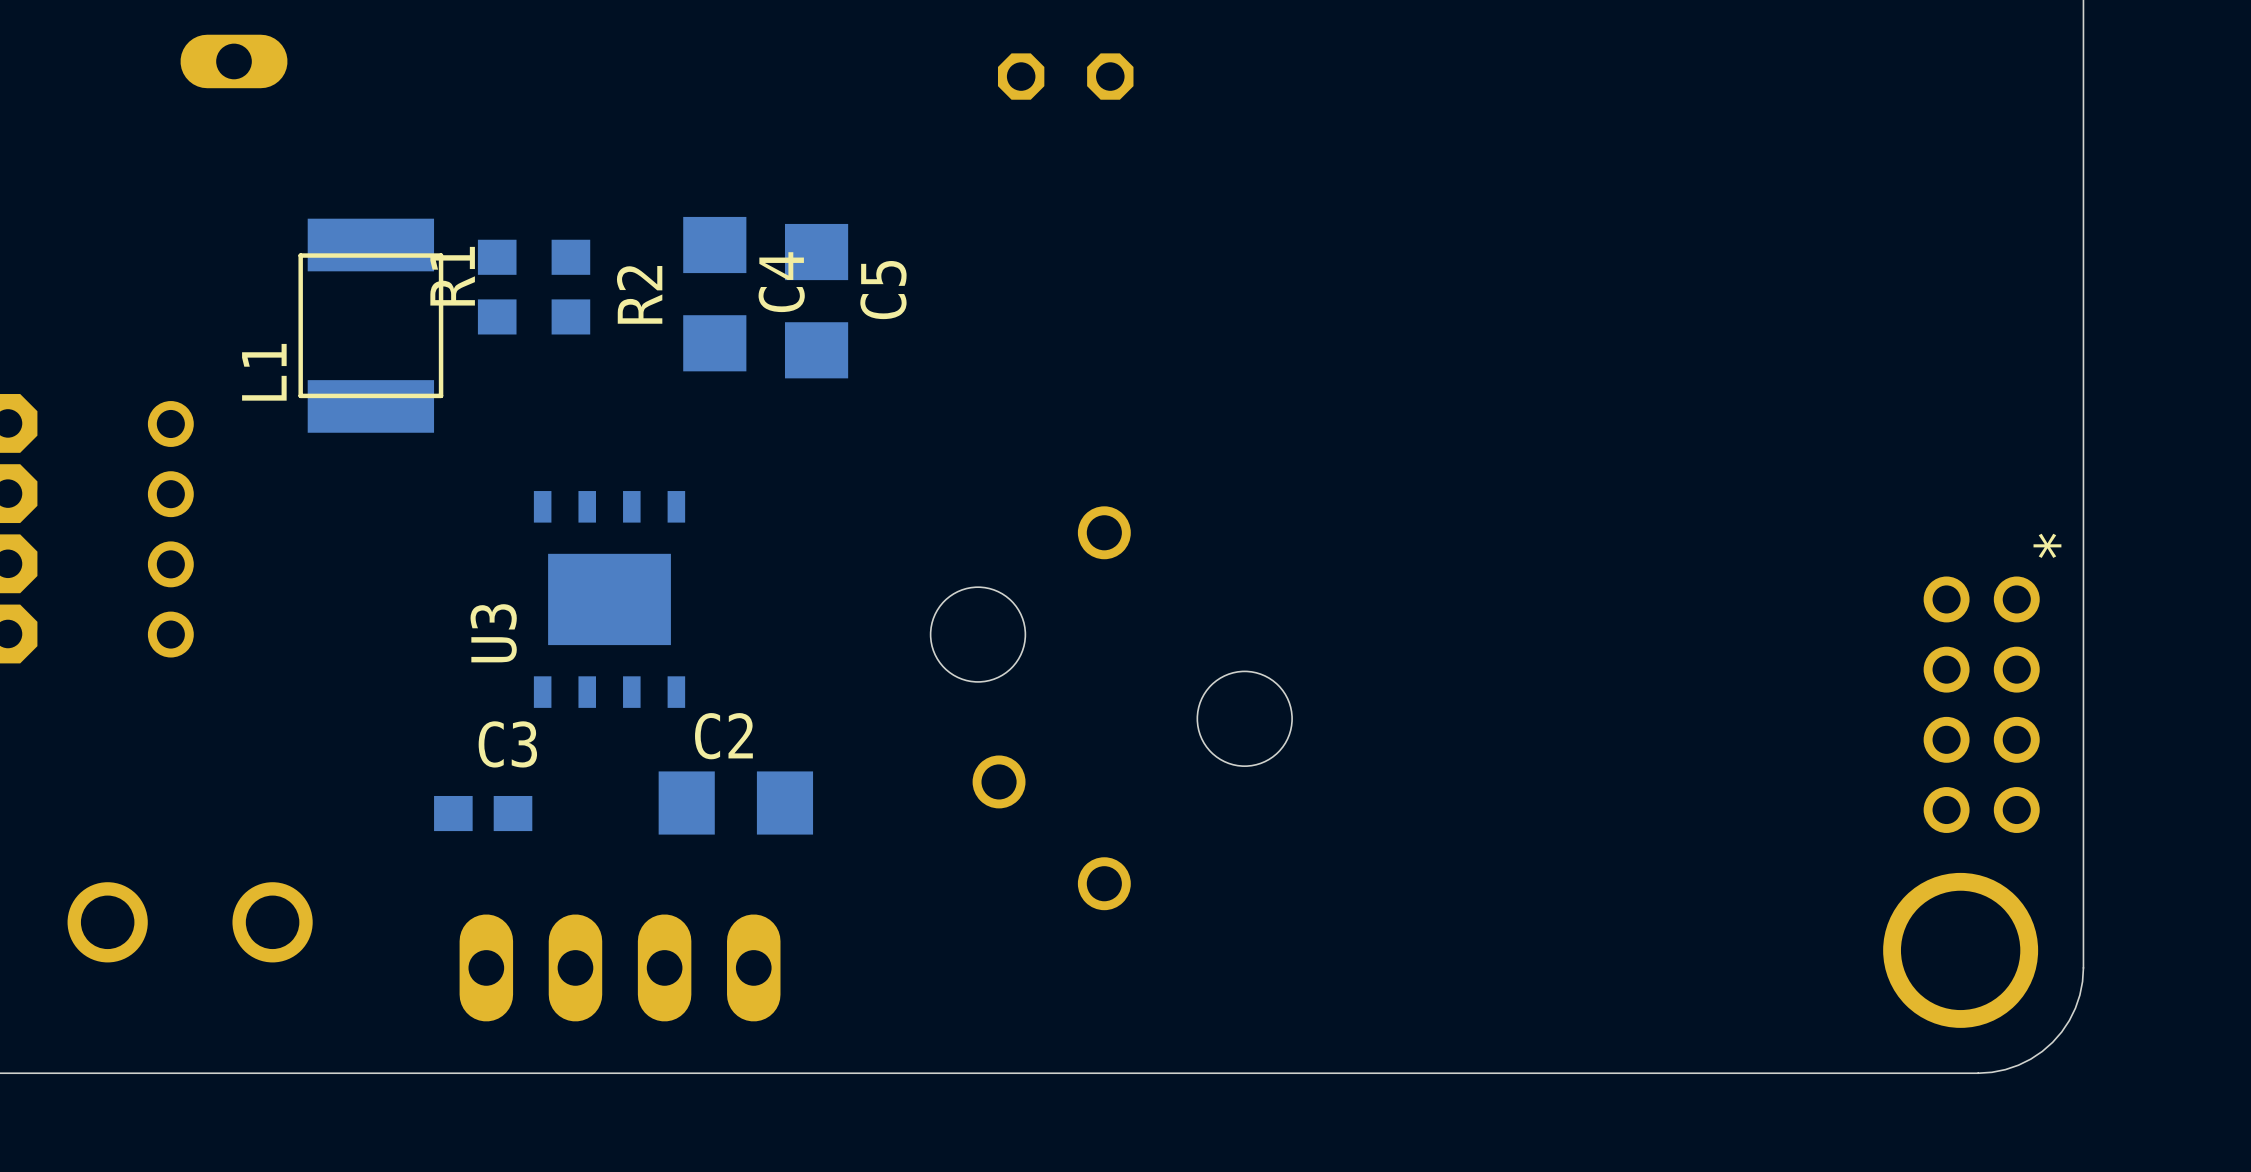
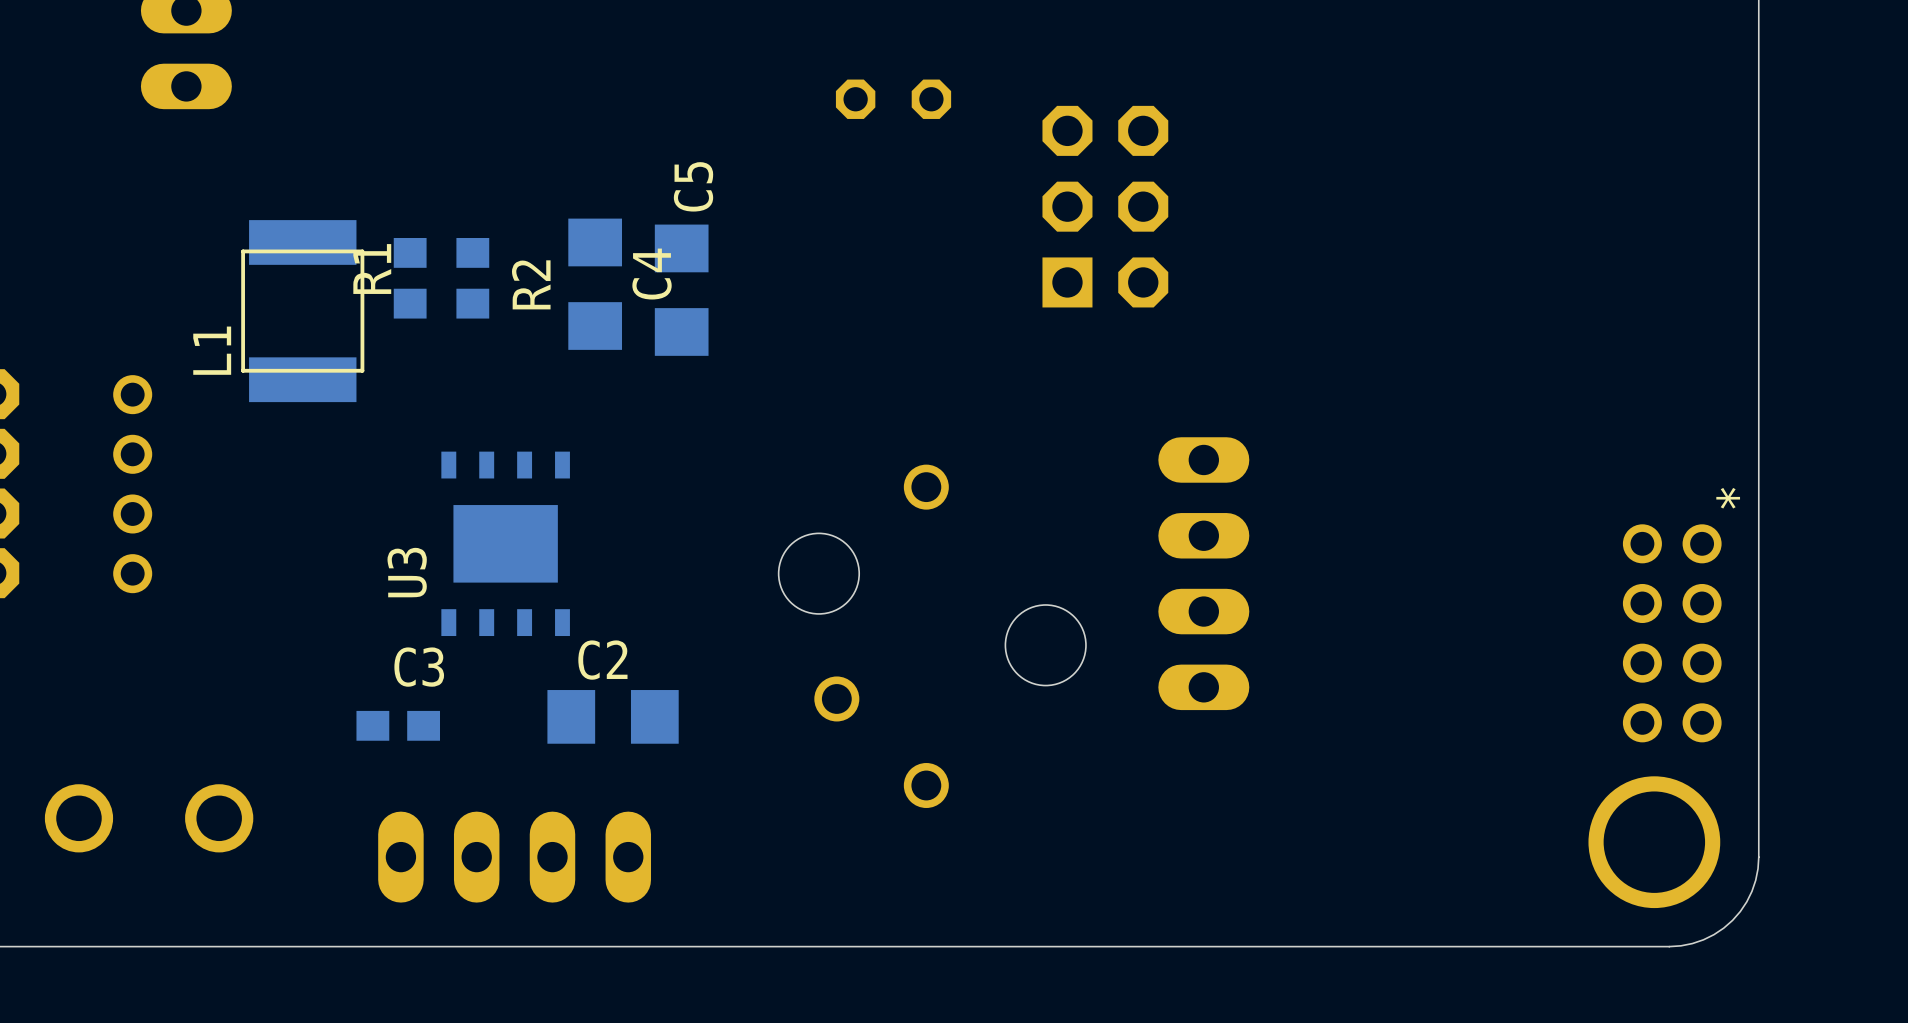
part: none -> (1105, 206)
C5 name position: C5 (883, 290) -> C5 (693, 186)
part: none -> (1203, 573)

